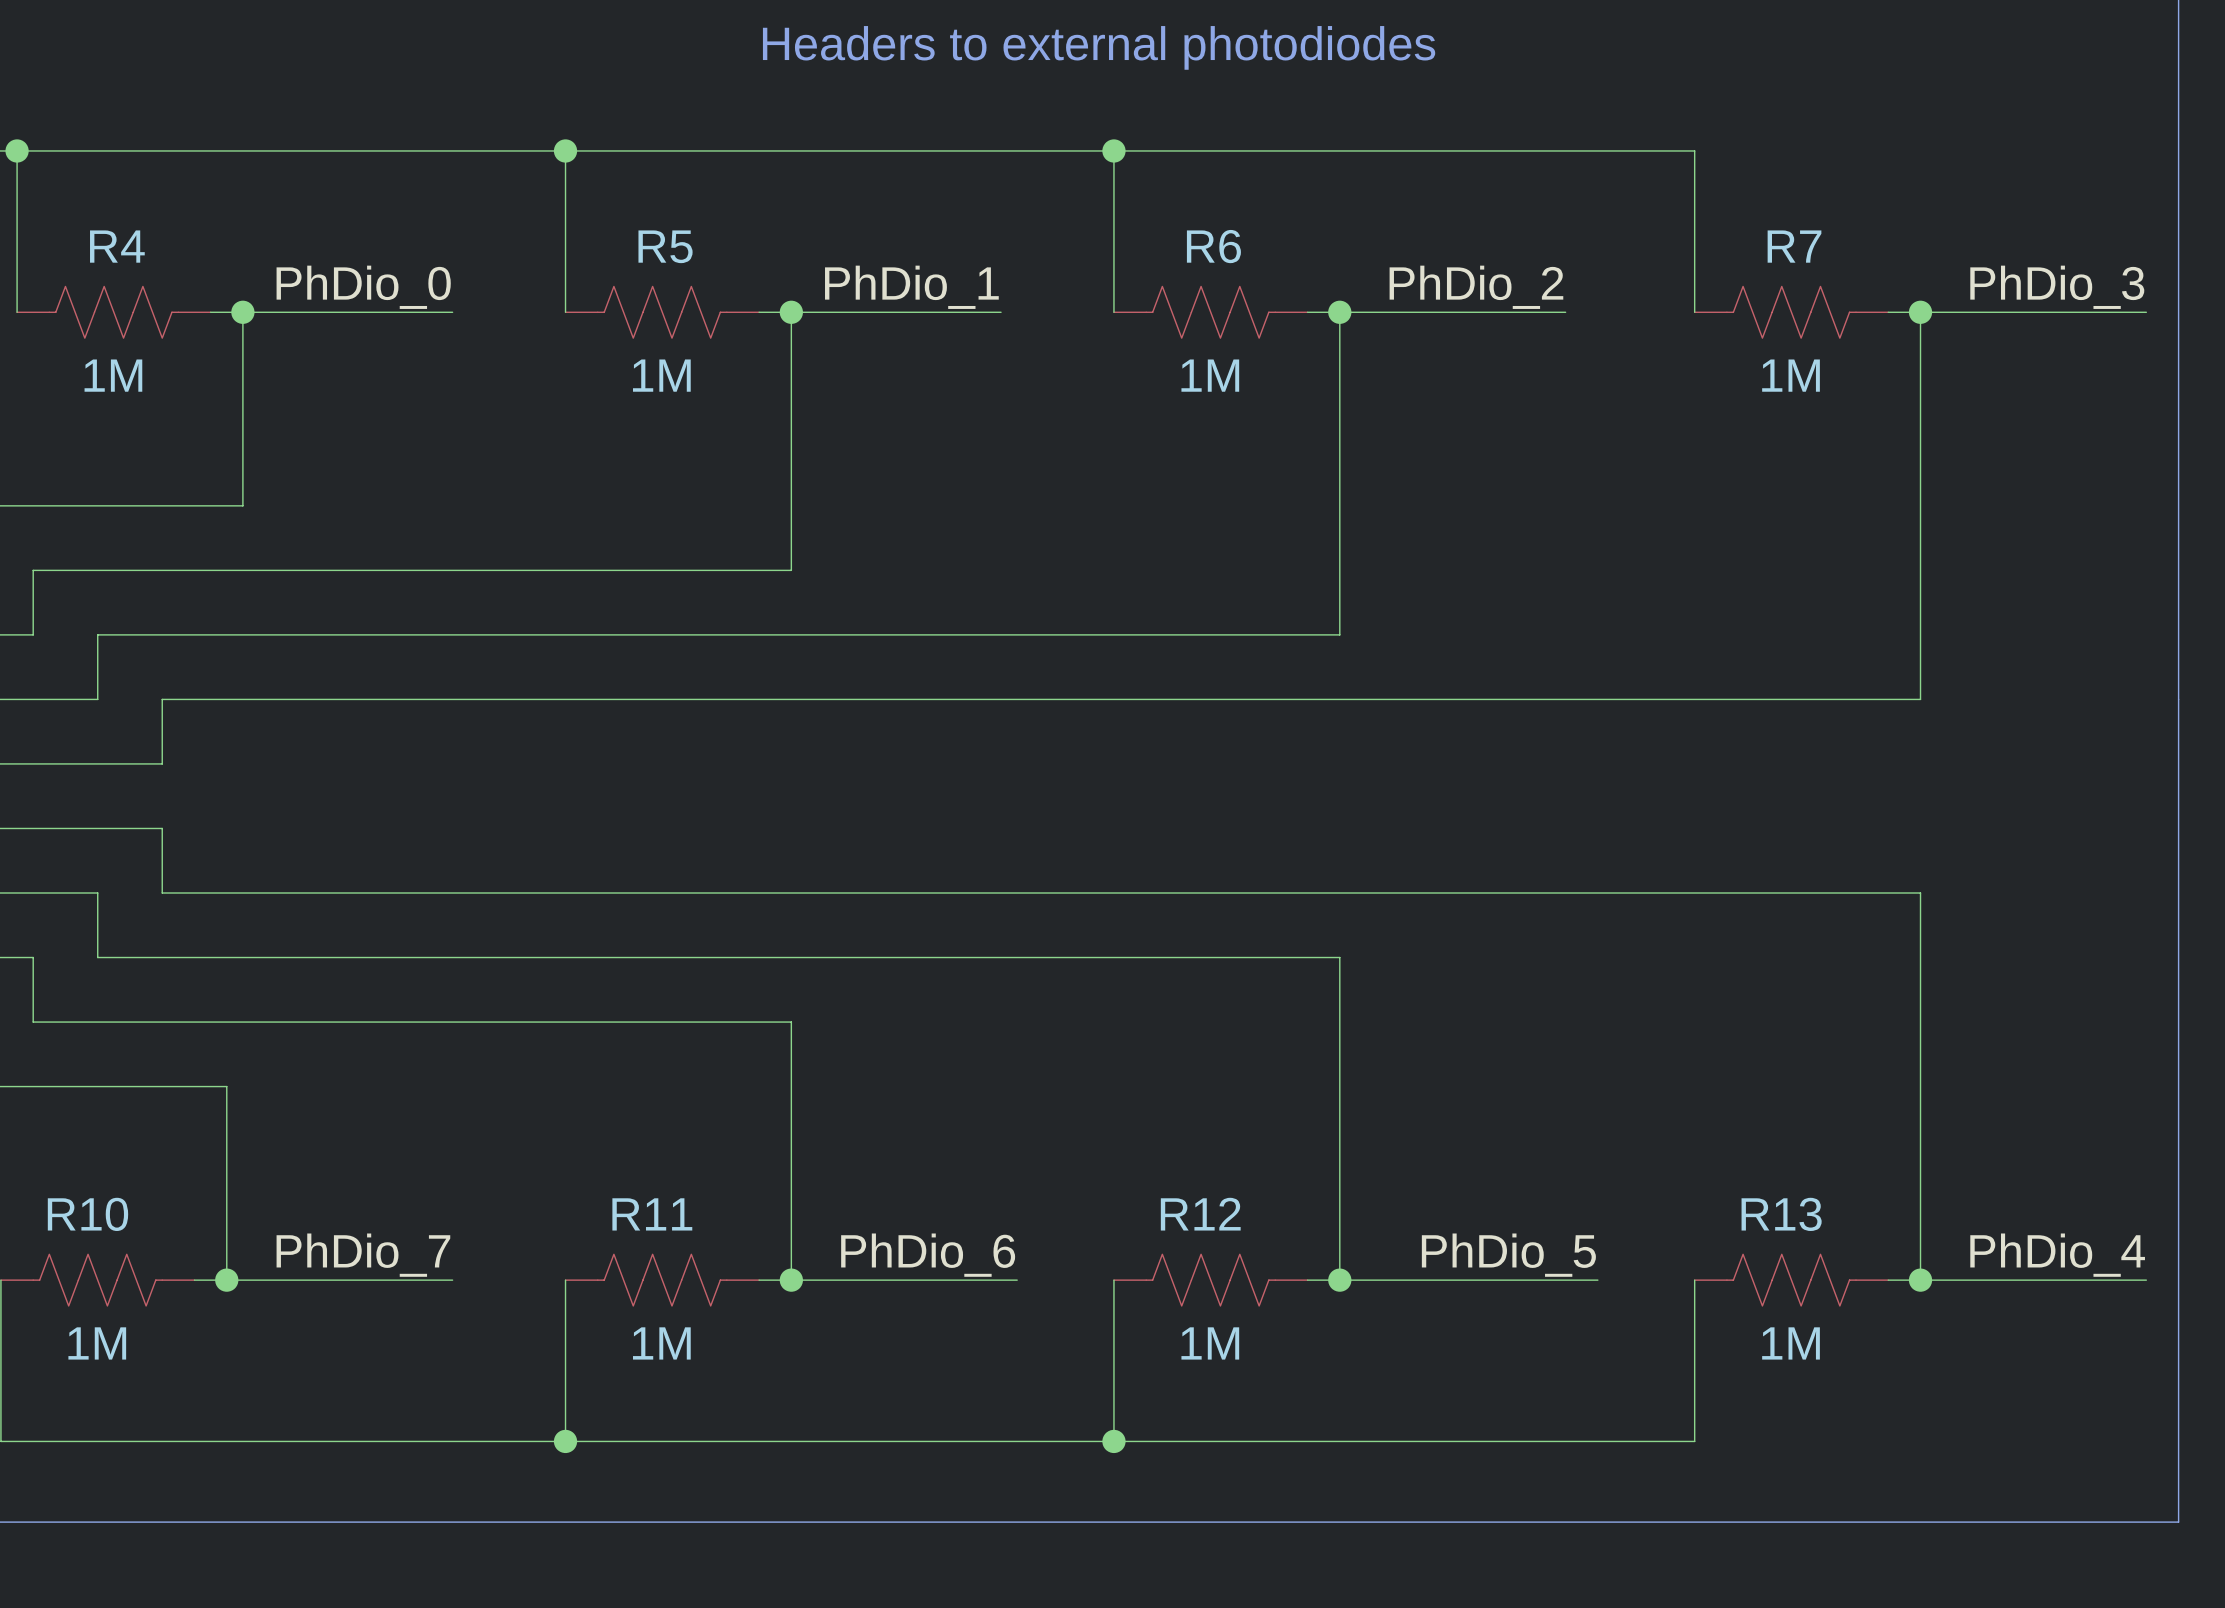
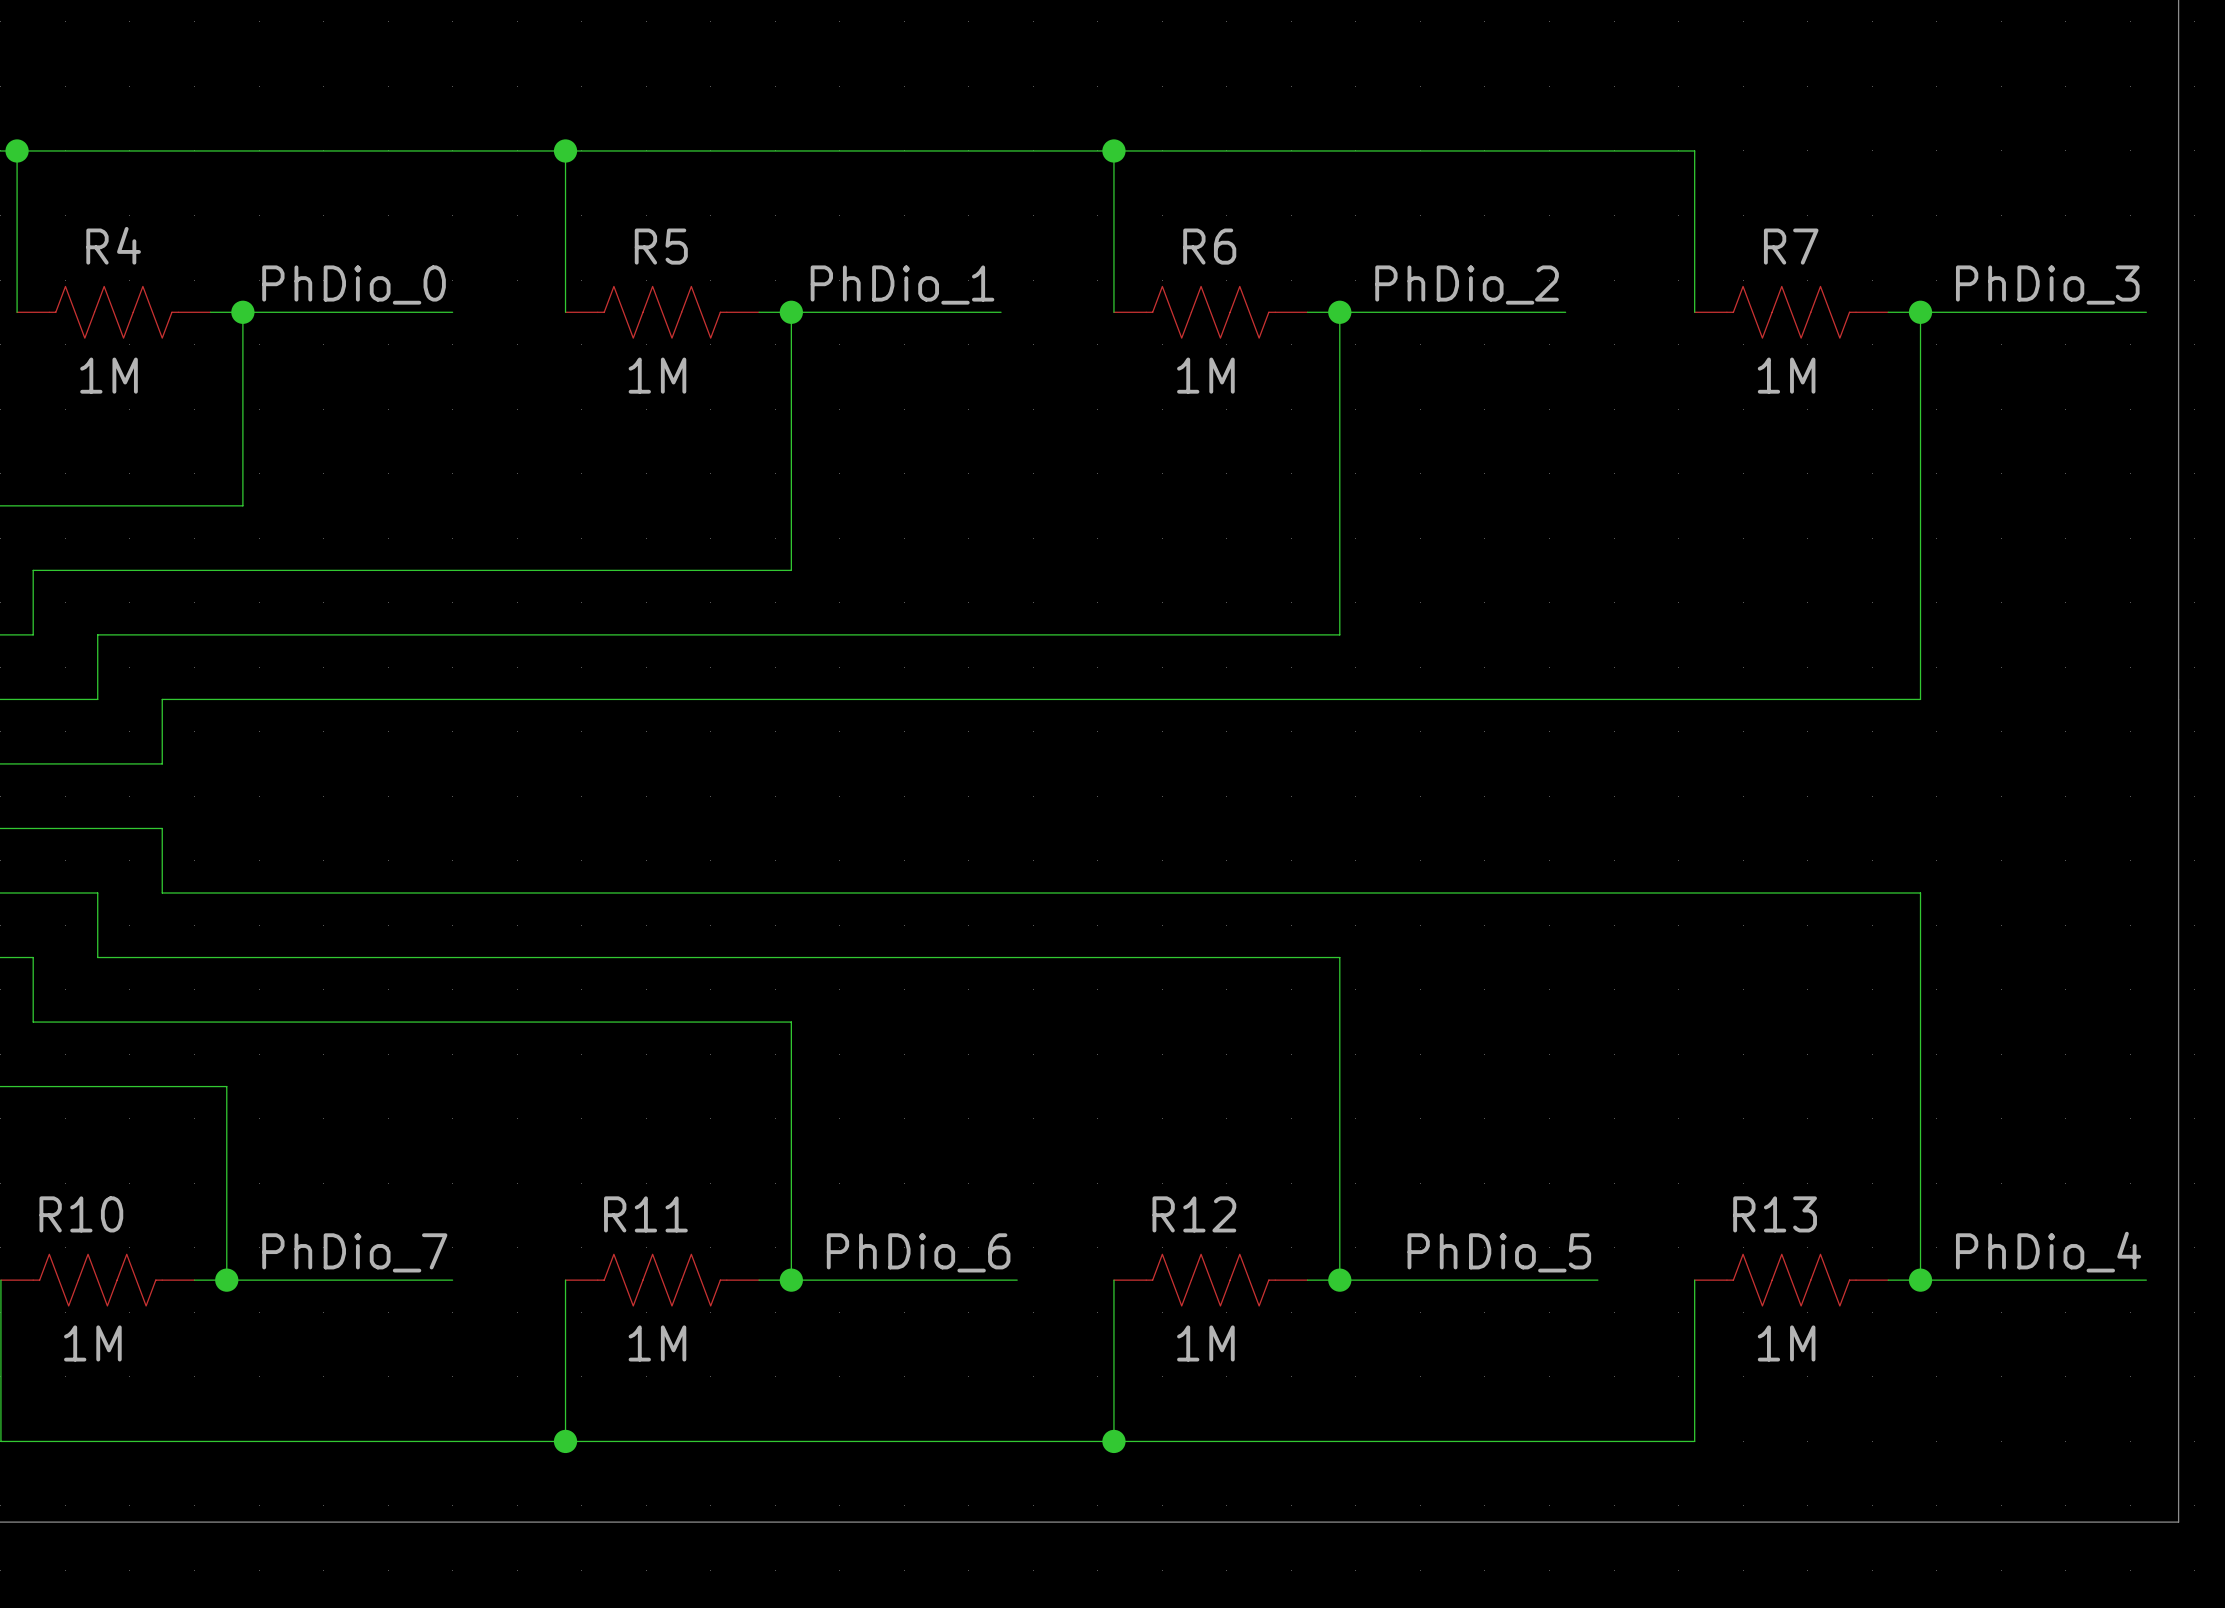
text: Headers to external photodiodes (1099, 47) -> none

